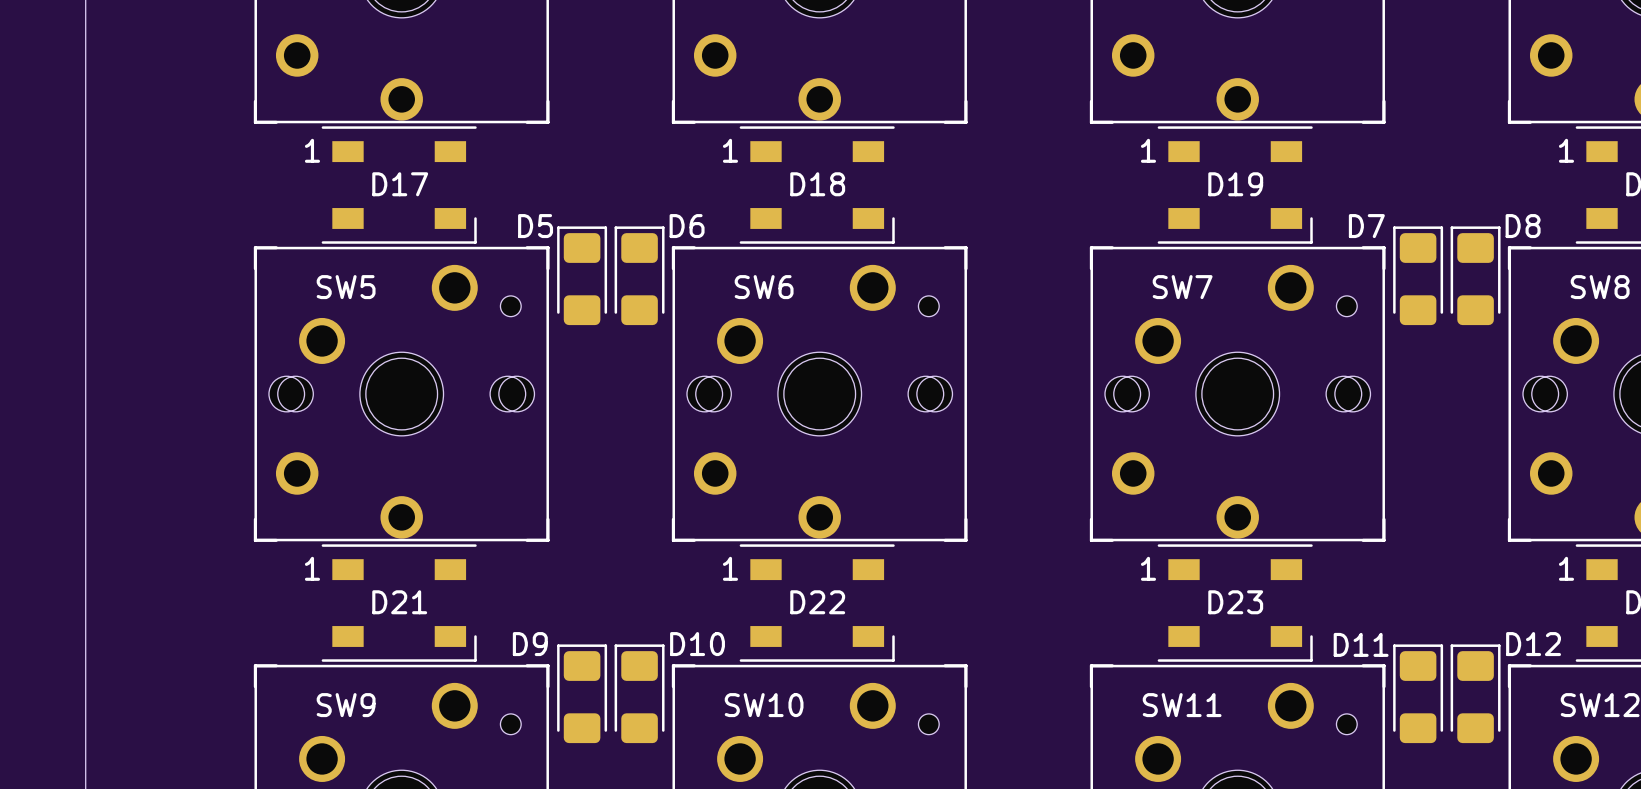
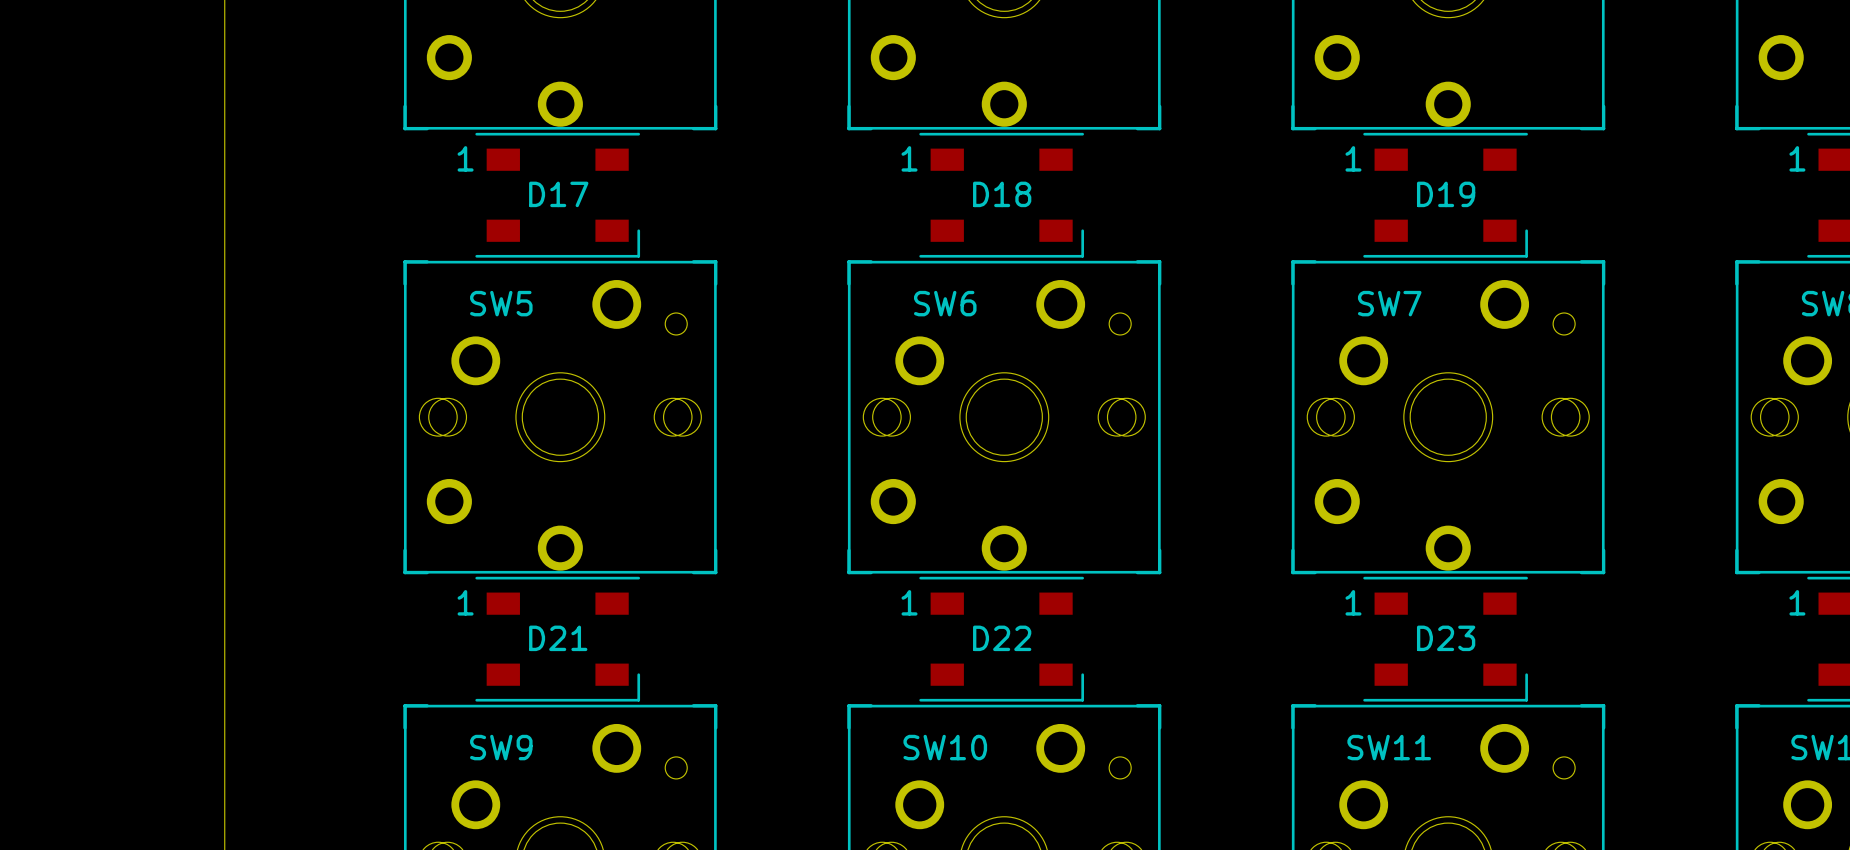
D5: (582, 275) -> none
D6: (639, 275) -> none
D7: (1418, 275) -> none
D8: (1475, 275) -> none
D9: (582, 693) -> none
D10: (639, 693) -> none
D11: (1418, 693) -> none
D12: (1475, 693) -> none

